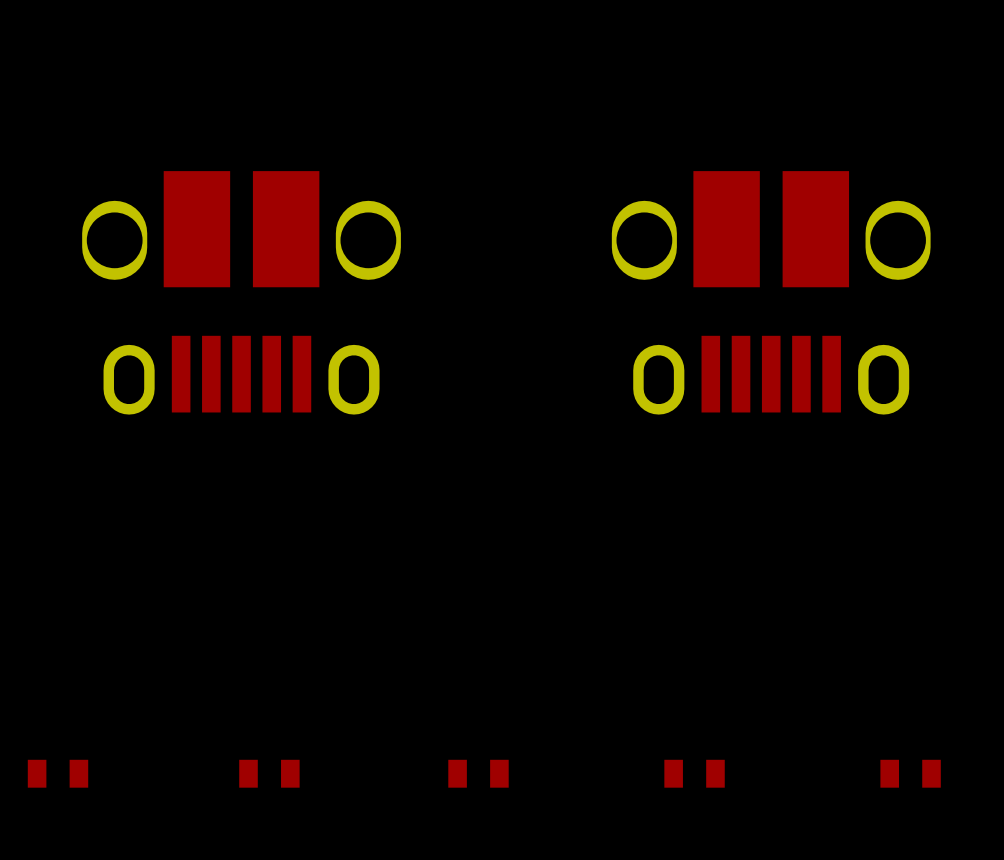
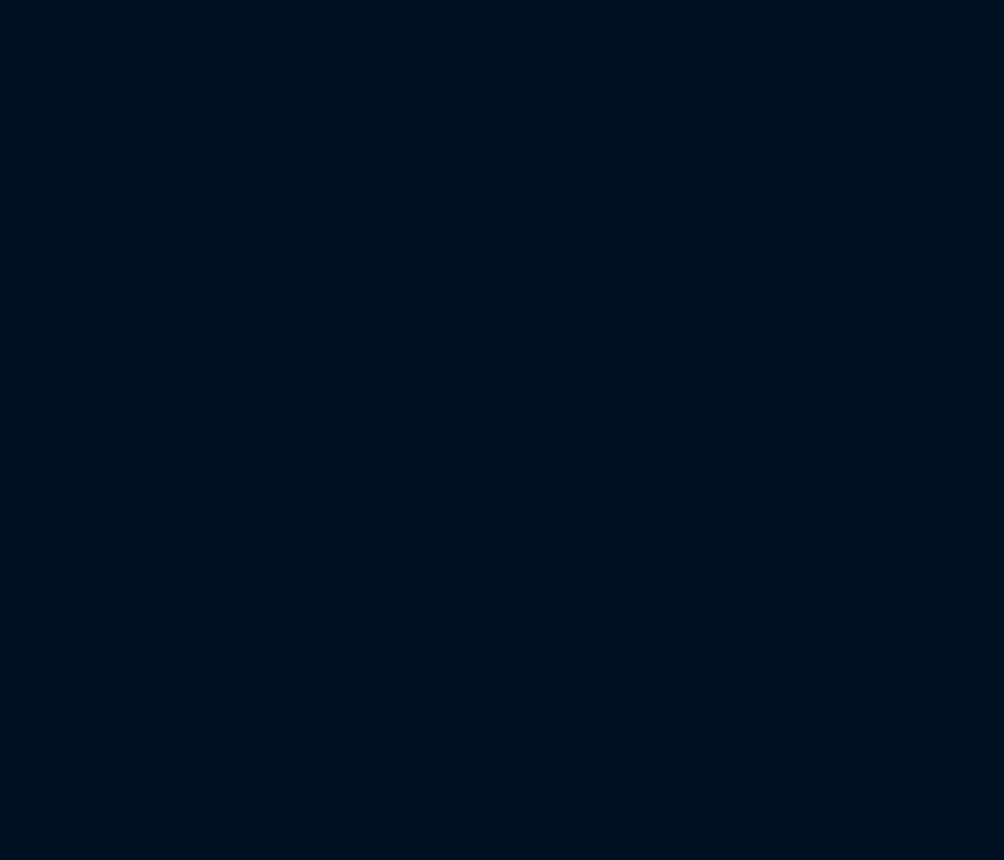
part: (241, 292) -> none
part: (771, 292) -> none
part: (58, 773) -> none
part: (269, 773) -> none
part: (478, 773) -> none
part: (694, 773) -> none
part: (910, 773) -> none

